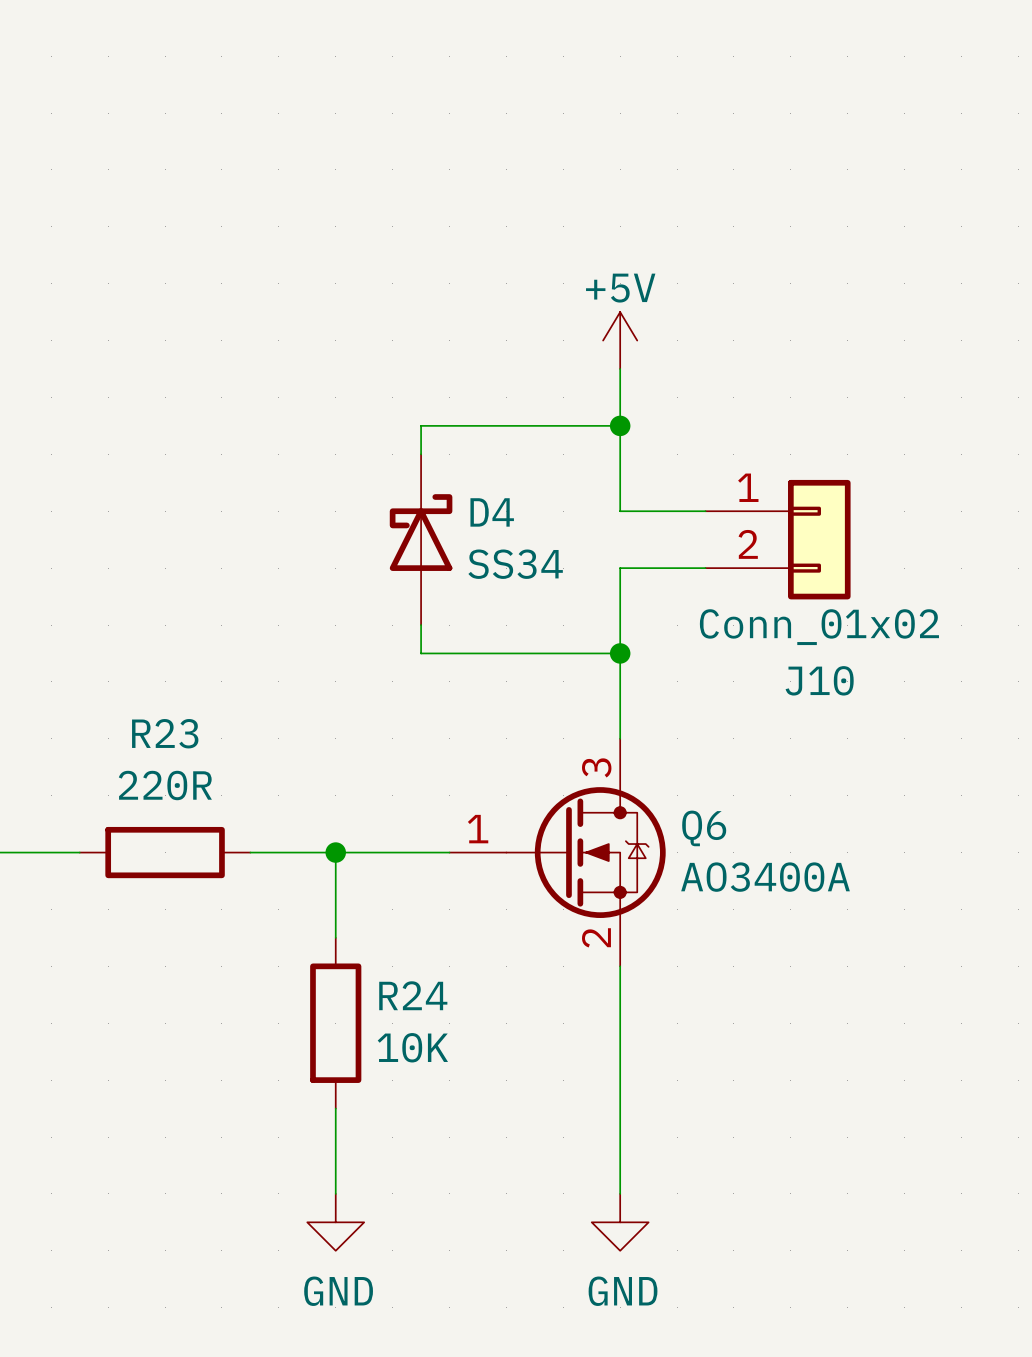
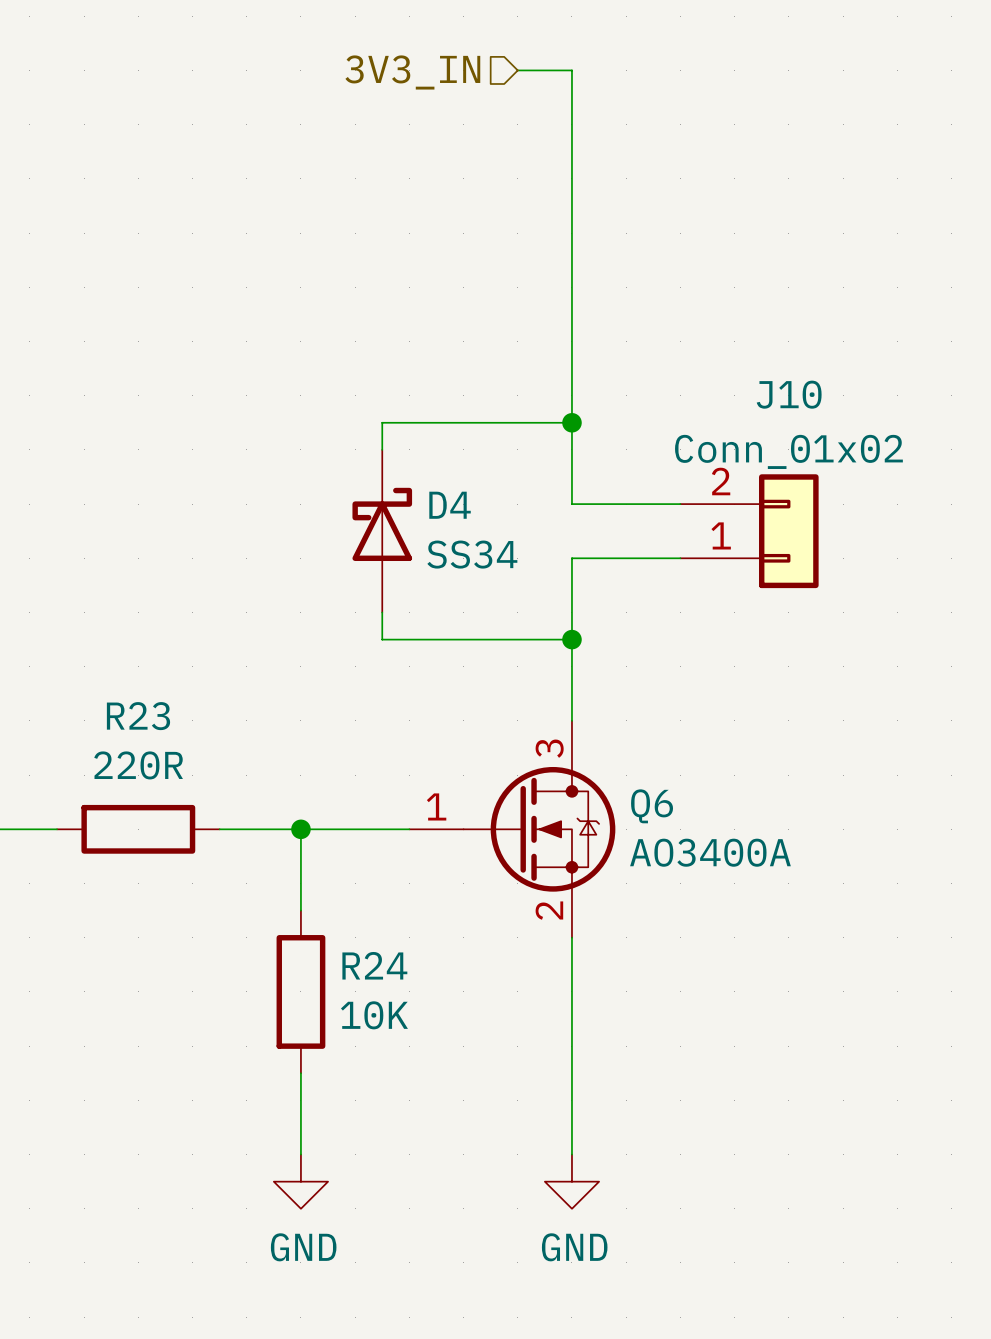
wire: none -> (517, 70) (571, 70) (571, 368)
hierarchical label: none -> 3V3_IN (412, 72)
power symbol: +5V (620, 340) -> none
J10 flip: as is (819, 539) -> up-down (788, 531)

